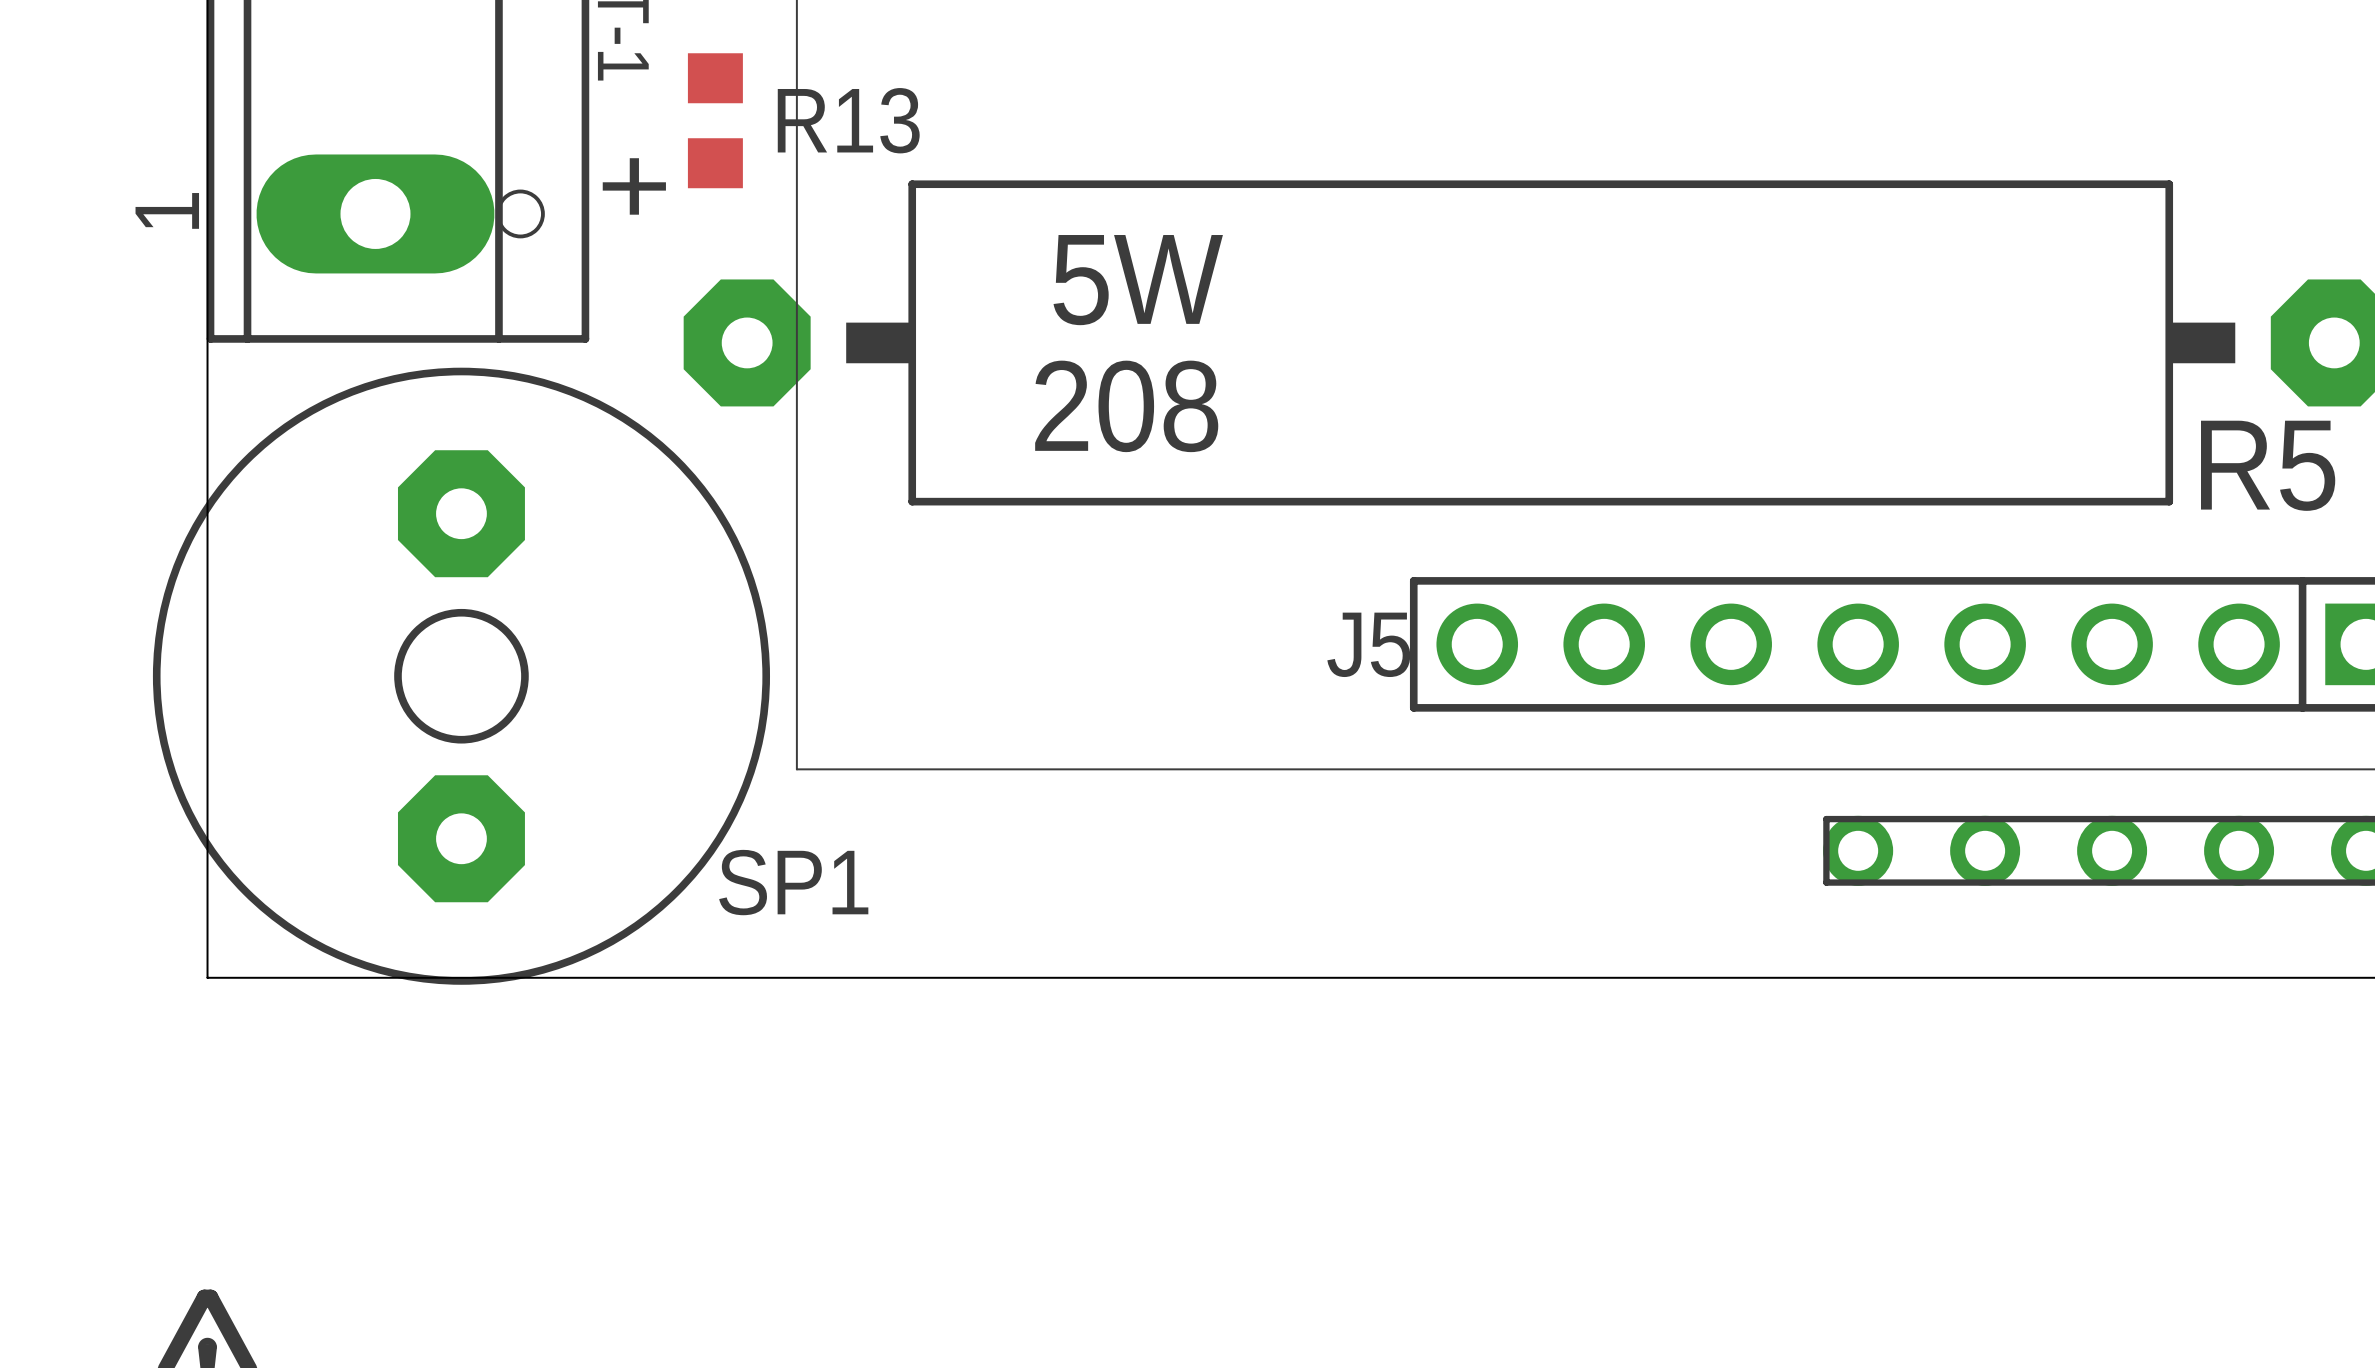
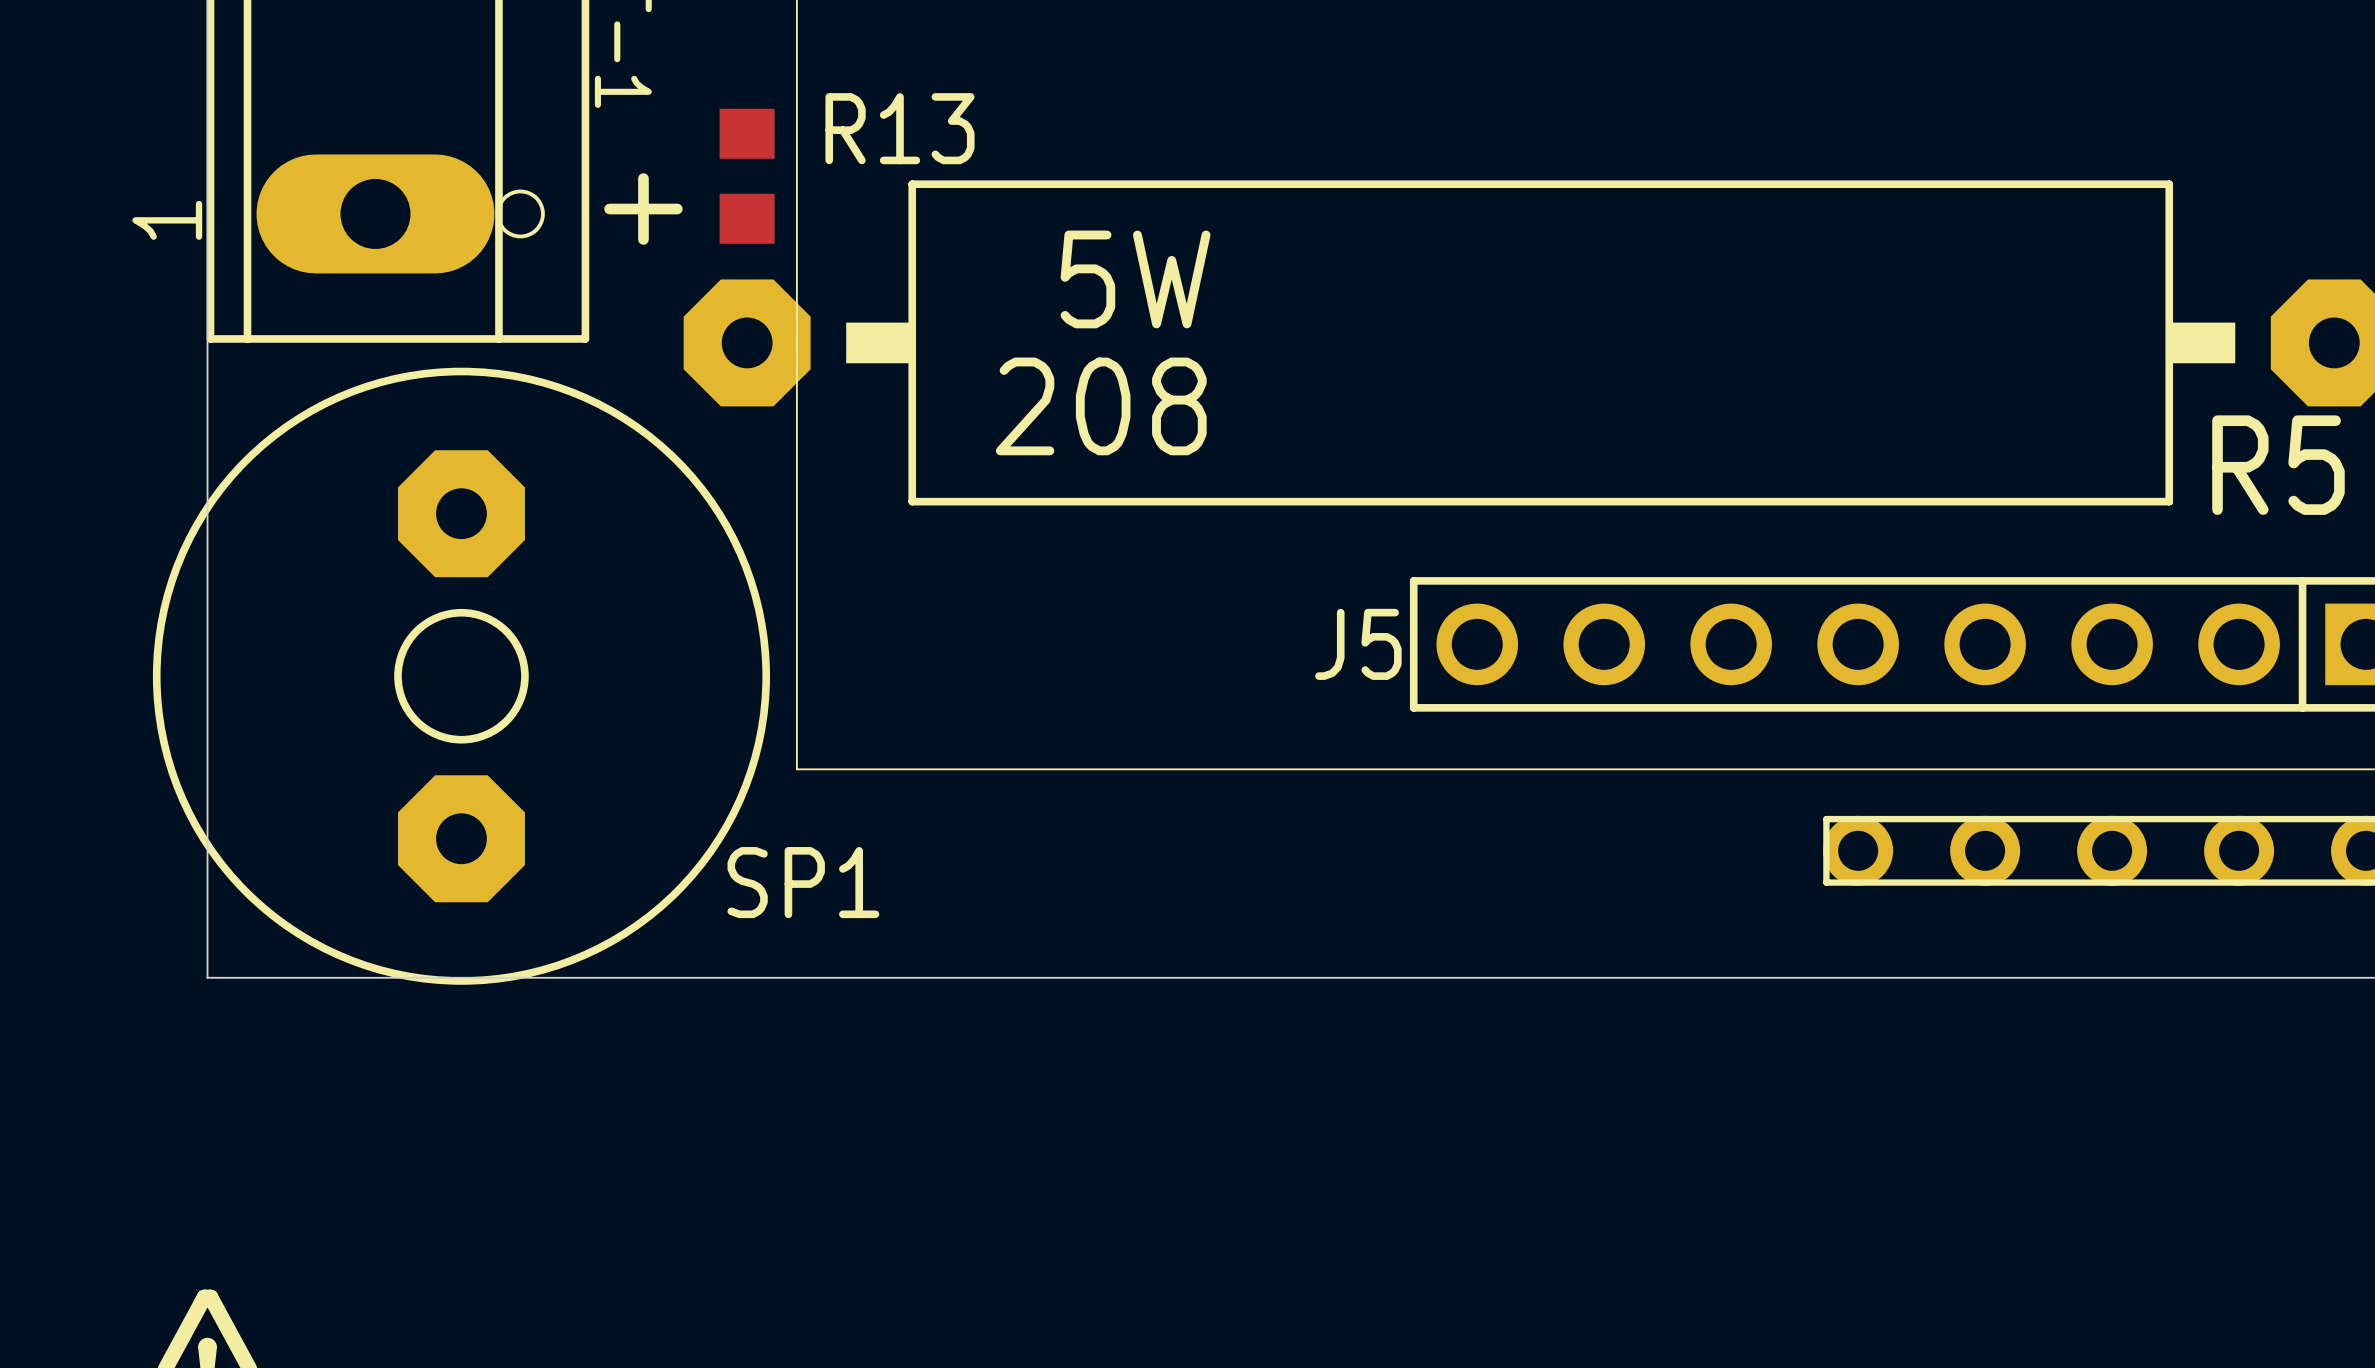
R13 position: (715, 120) -> (747, 176)
R13 name position: R13 (848, 120) -> R13 (899, 128)

